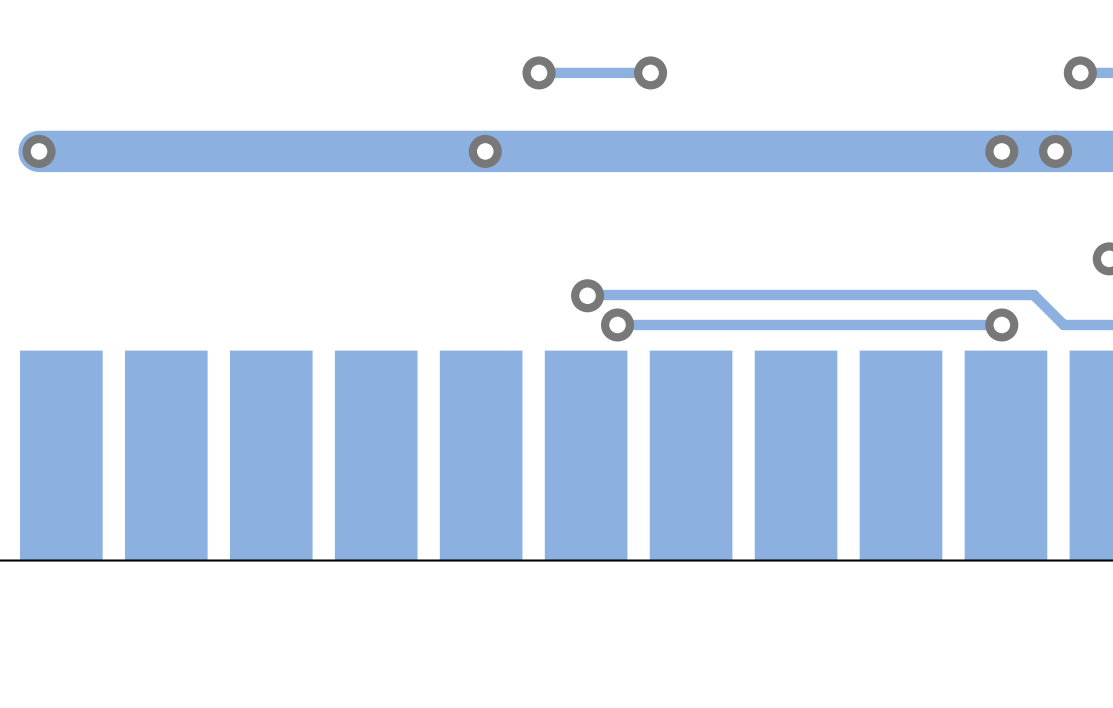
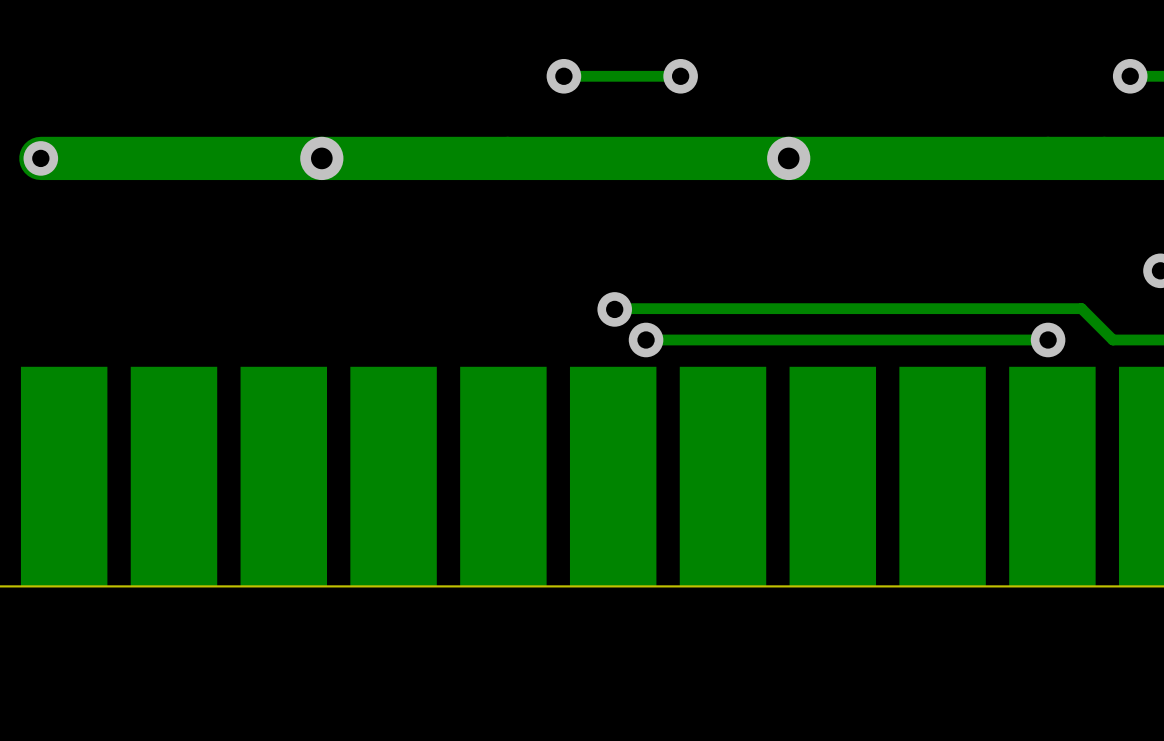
via: none -> (321, 158)
via: (485, 151) -> none
via: none -> (788, 158)
via: (1001, 151) -> none
via: (1055, 151) -> none

